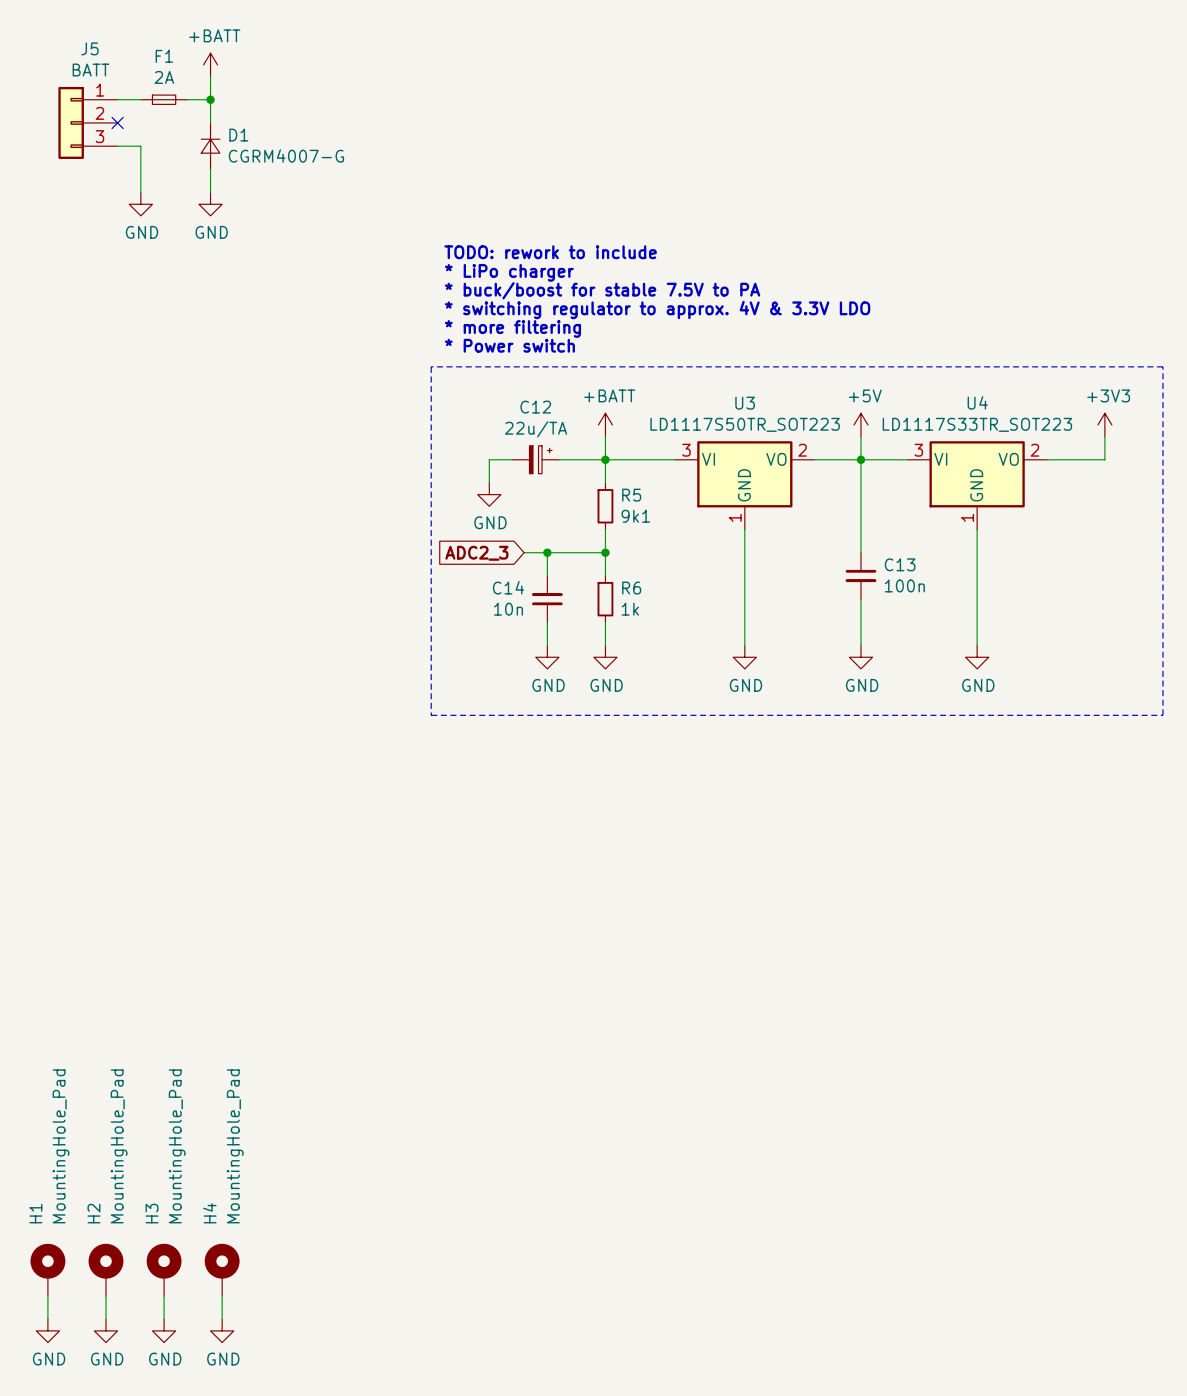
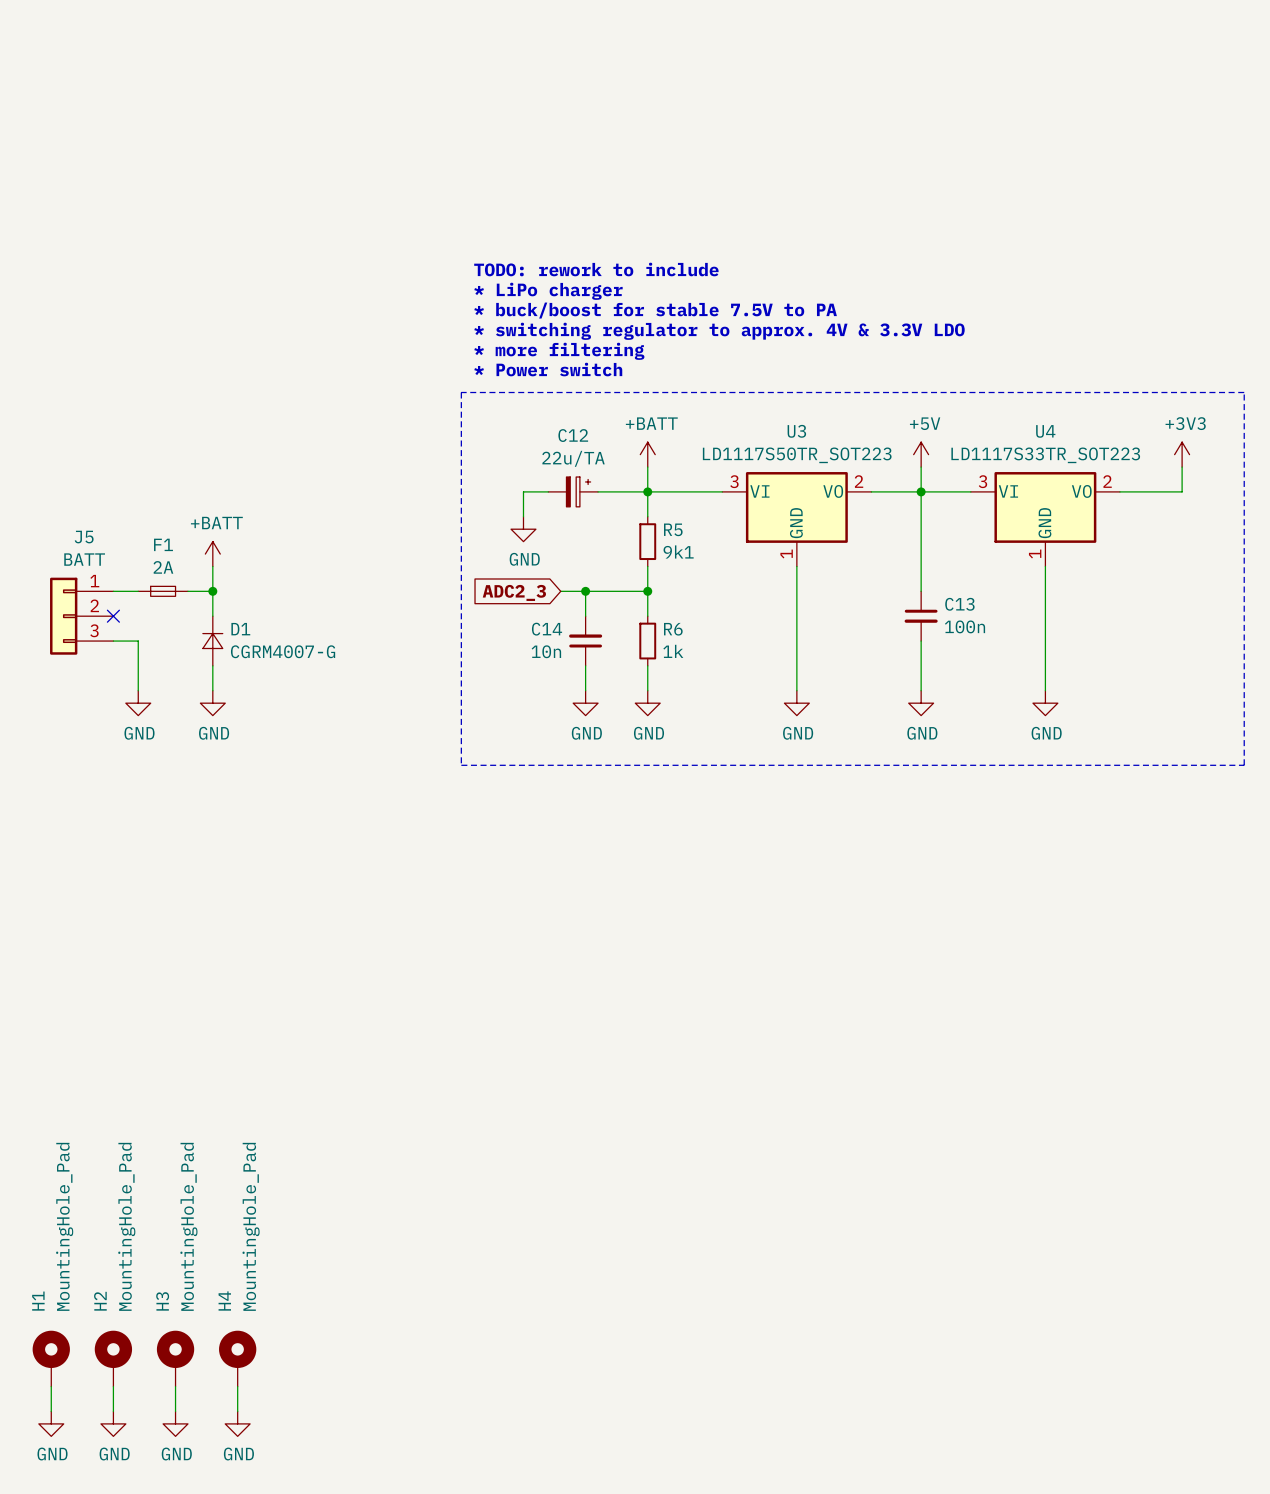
power symbol: +BATT (210, 64) -> none
wire: (210, 76) (210, 122) -> none
wire: (117, 99) (140, 99) -> none
F1 position: (164, 99) -> (163, 591)
wire: (187, 99) (210, 99) -> none
junction: (210, 99) -> none
J5 position: (88, 122) -> (81, 616)
no-connect mark: (117, 122) -> none
wire: (117, 146) (140, 146) (140, 192) -> none
D1 position: (210, 146) -> (212, 641)
wire: (210, 169) (210, 192) -> none
power symbol: GND (140, 204) -> none
power symbol: GND (210, 204) -> none
power symbol: none -> +BATT (212, 554)
wire: none -> (212, 566) (212, 616)
wire: none -> (113, 591) (138, 591)
wire: none -> (187, 591) (212, 591)
junction: none -> (212, 591)
no-connect mark: none -> (113, 616)
wire: none -> (113, 641) (138, 641) (138, 690)
wire: none -> (212, 665) (212, 690)
power symbol: none -> GND (138, 703)
power symbol: none -> GND (212, 703)

